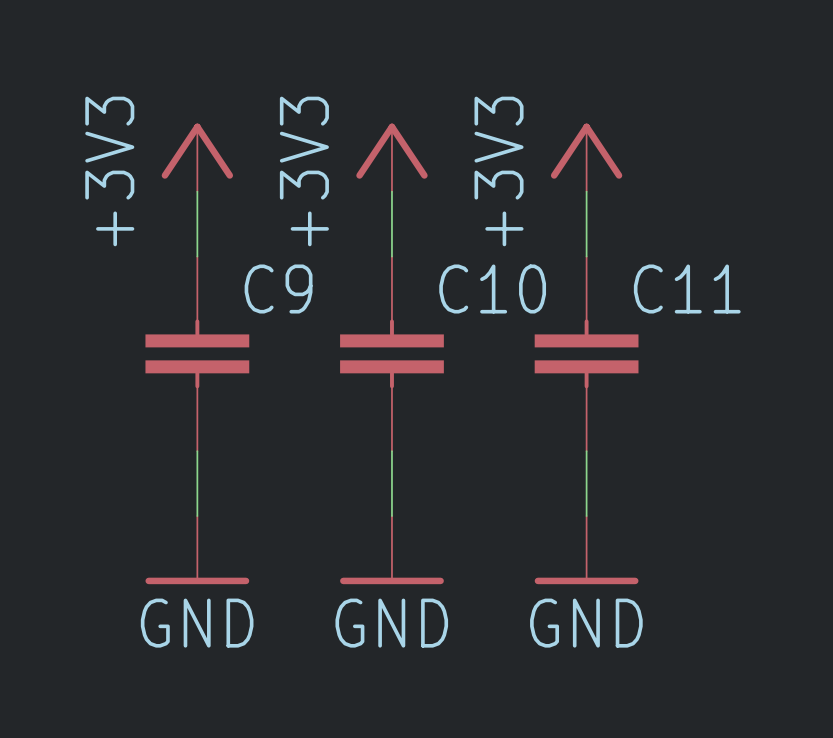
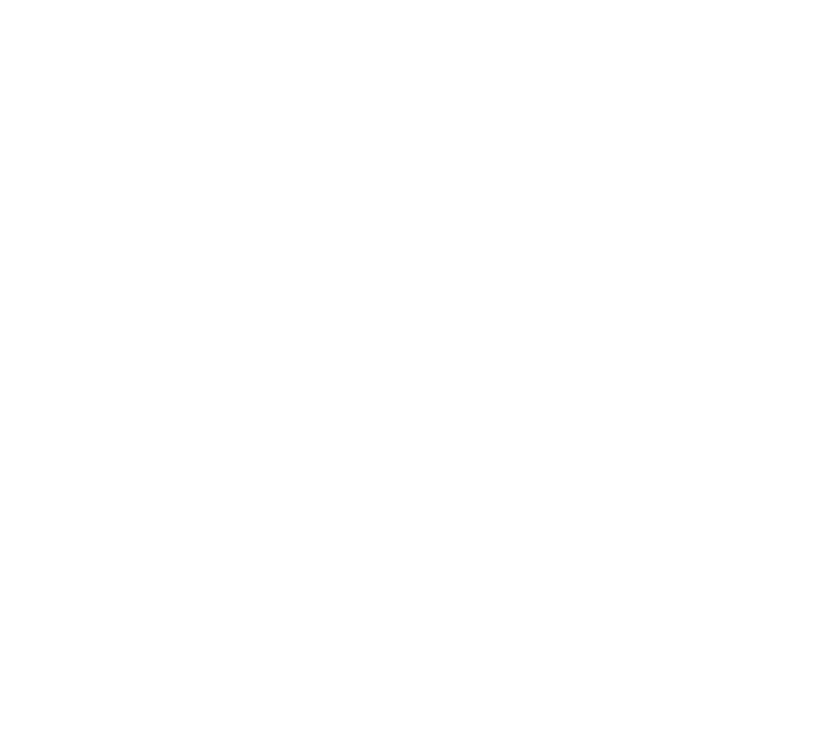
power symbol: +3V3 (197, 157) -> none
power symbol: +3V3 (391, 157) -> none
power symbol: +3V3 (586, 157) -> none
wire: (197, 191) (197, 256) -> none
wire: (391, 191) (391, 256) -> none
wire: (586, 191) (586, 256) -> none
C9: (197, 353) -> none
C10: (391, 353) -> none
C11: (586, 353) -> none
wire: (197, 451) (197, 516) -> none
wire: (391, 451) (391, 516) -> none
wire: (586, 451) (586, 516) -> none
power symbol: GND (197, 550) -> none
power symbol: GND (391, 550) -> none
power symbol: GND (586, 550) -> none

